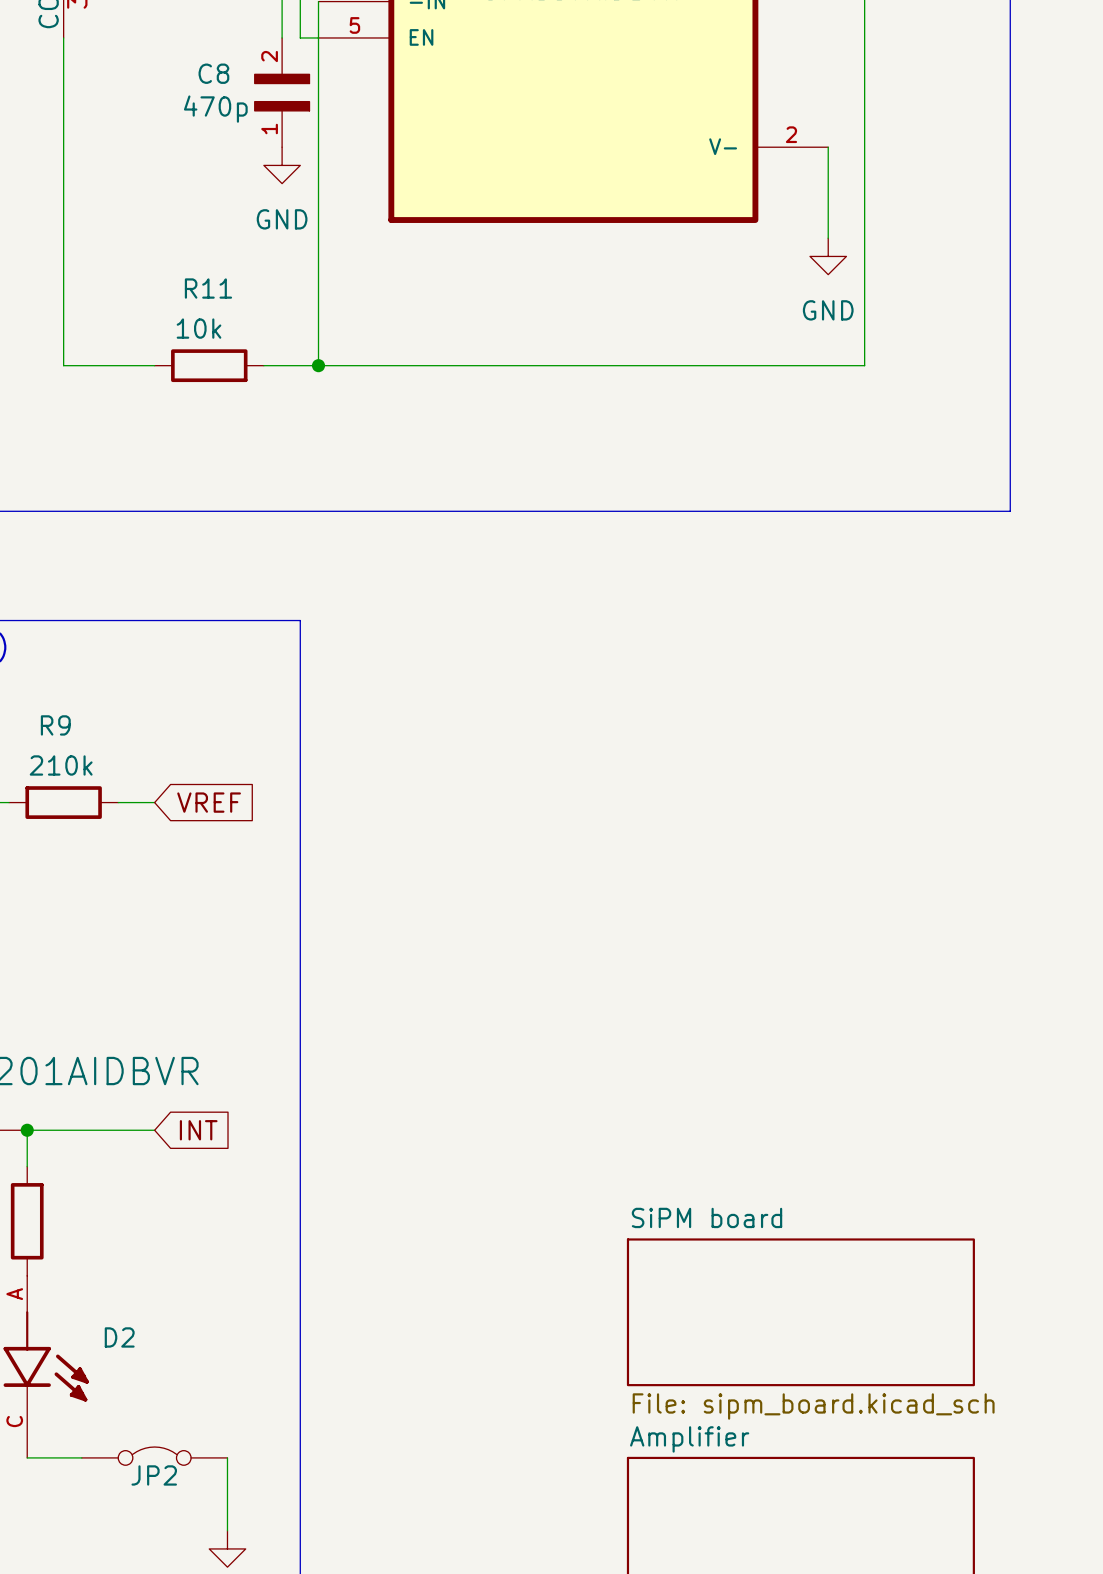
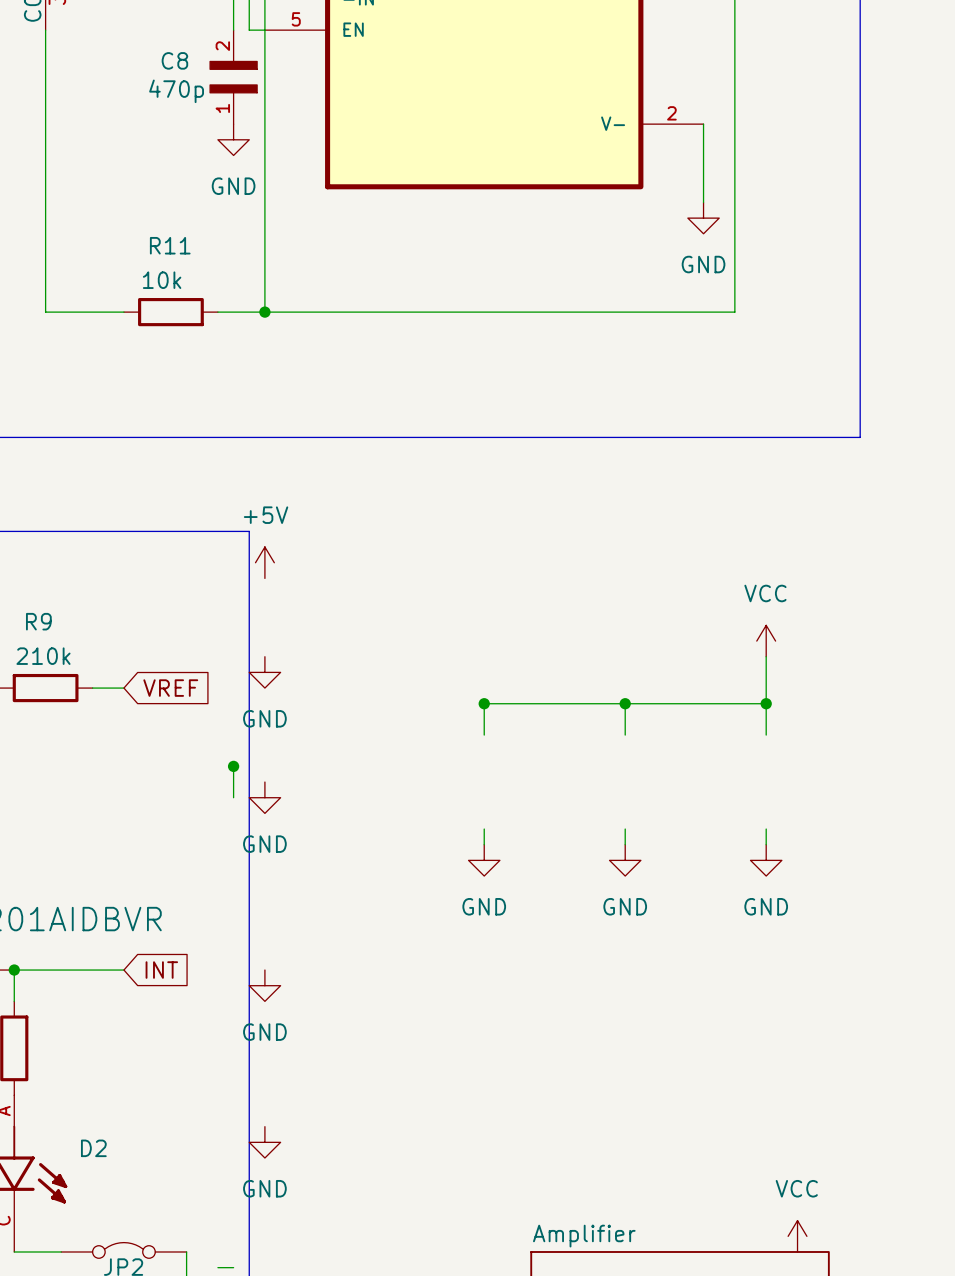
power symbol: none -> +5V (264, 562)
power symbol: none -> VCC (766, 641)
wire: none -> (766, 656) (766, 735)
power symbol: none -> GND (264, 672)
junction: none -> (484, 703)
wire: none -> (625, 703) (625, 735)
junction: none -> (625, 703)
wire: none -> (766, 703) (484, 703) (484, 735)
junction: none -> (766, 703)
wire: none -> (233, 766) (233, 797)
junction: none -> (233, 766)
power symbol: none -> GND (264, 797)
wire: none -> (484, 829) (484, 844)
wire: none -> (625, 829) (625, 844)
wire: none -> (766, 829) (766, 844)
power symbol: none -> GND (484, 860)
power symbol: none -> GND (625, 860)
power symbol: none -> GND (766, 860)
power symbol: none -> GND (264, 985)
sheet SiPM board: File: sipm_board.kicad_sch (800, 1312) -> none
power symbol: none -> GND (264, 1142)
power symbol: none -> VCC (797, 1236)
wire: none -> (217, 1267) (233, 1267)

